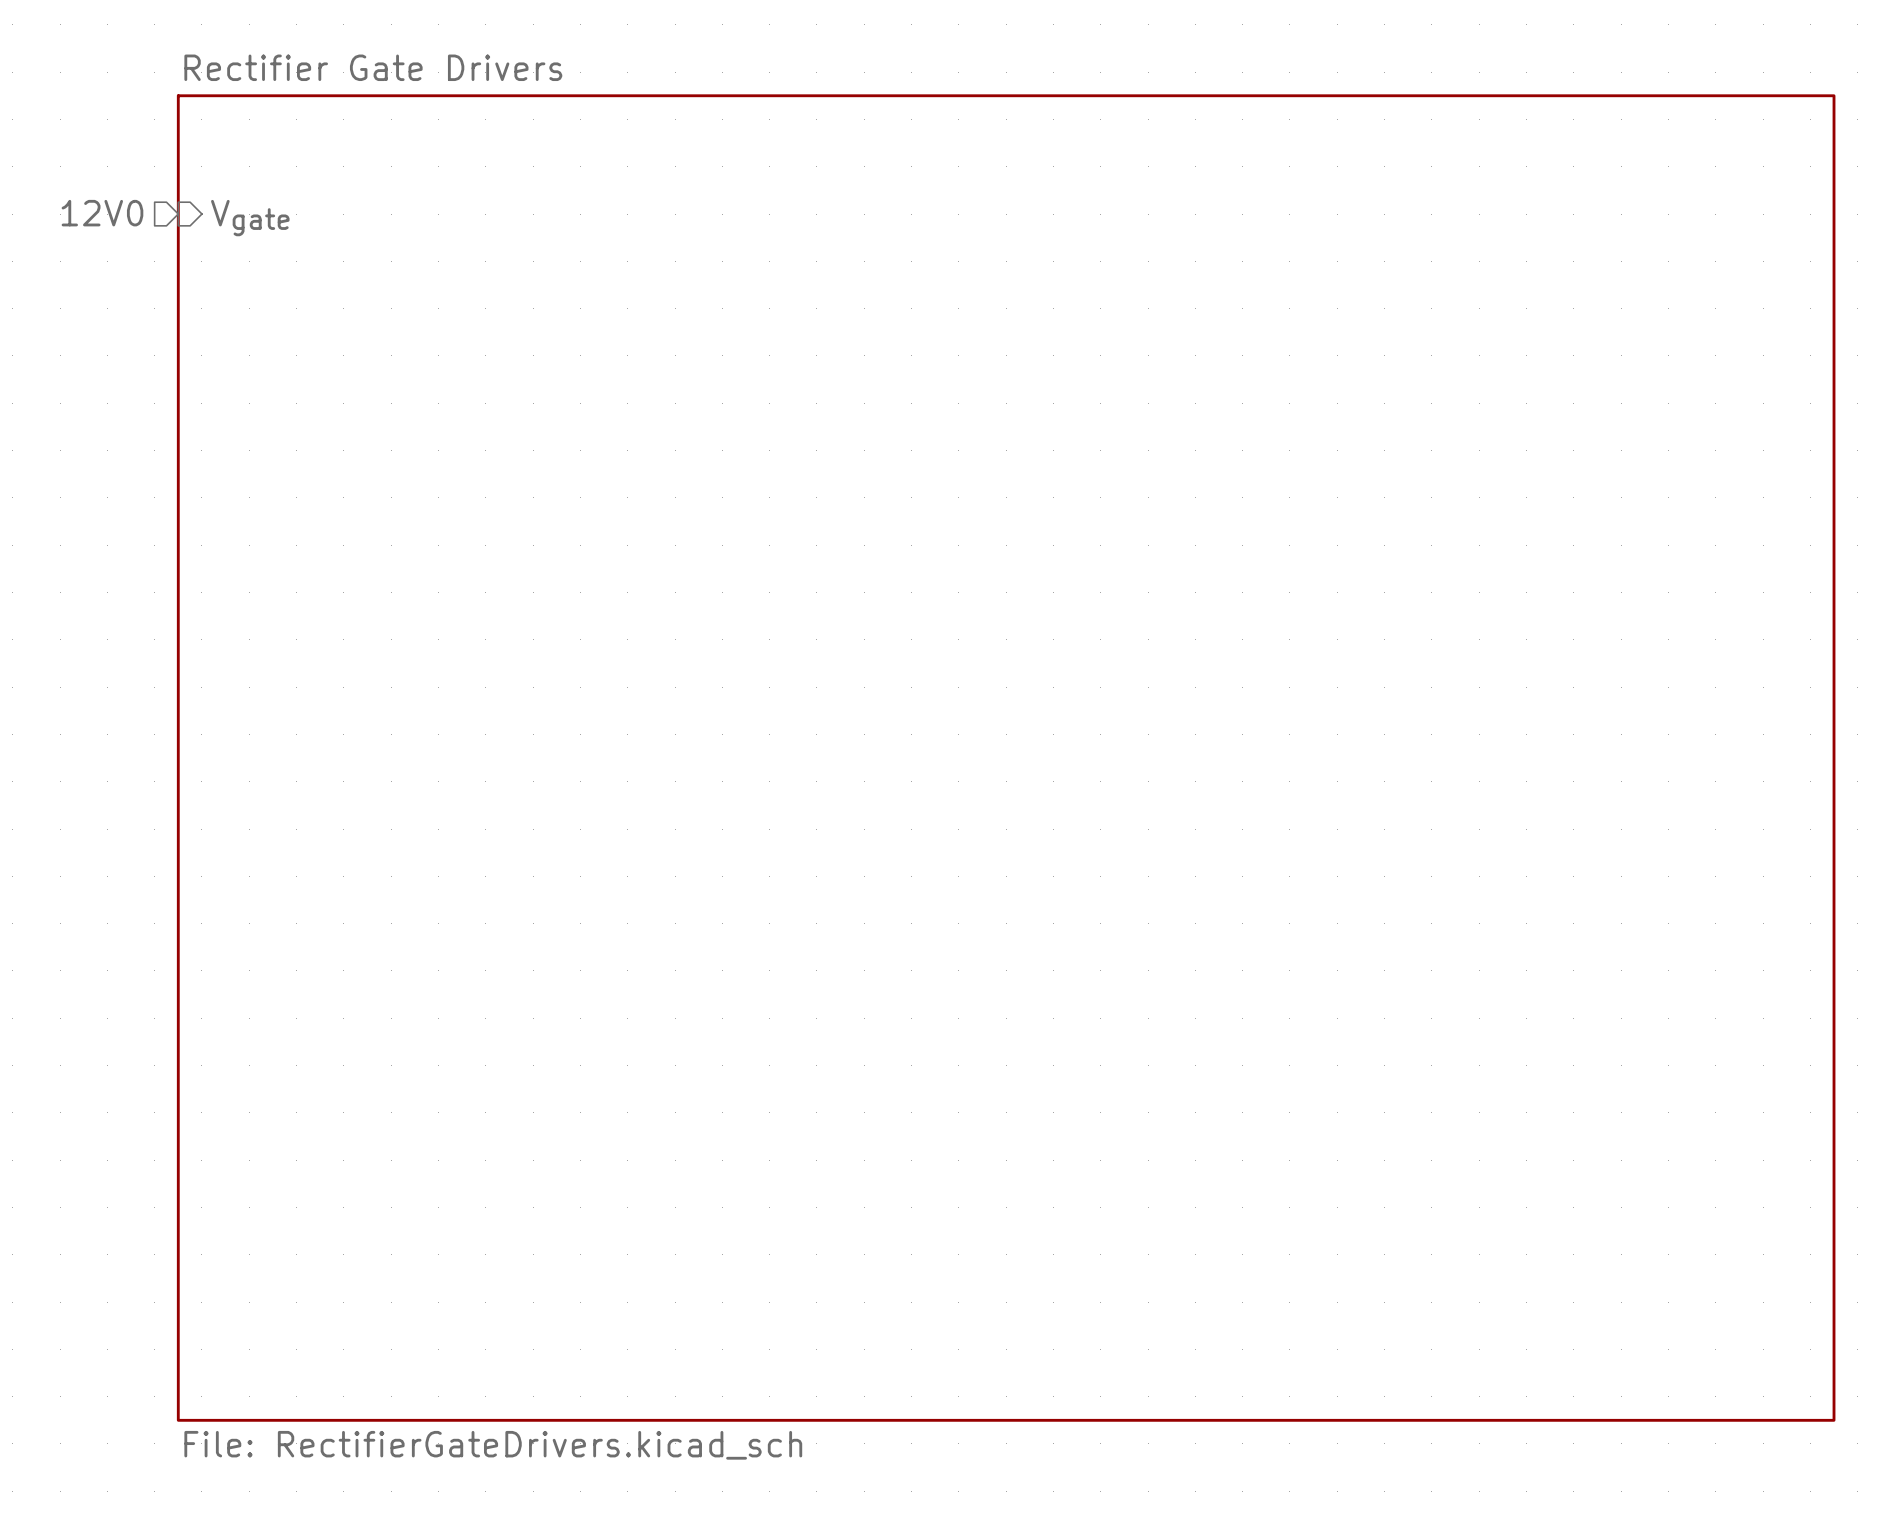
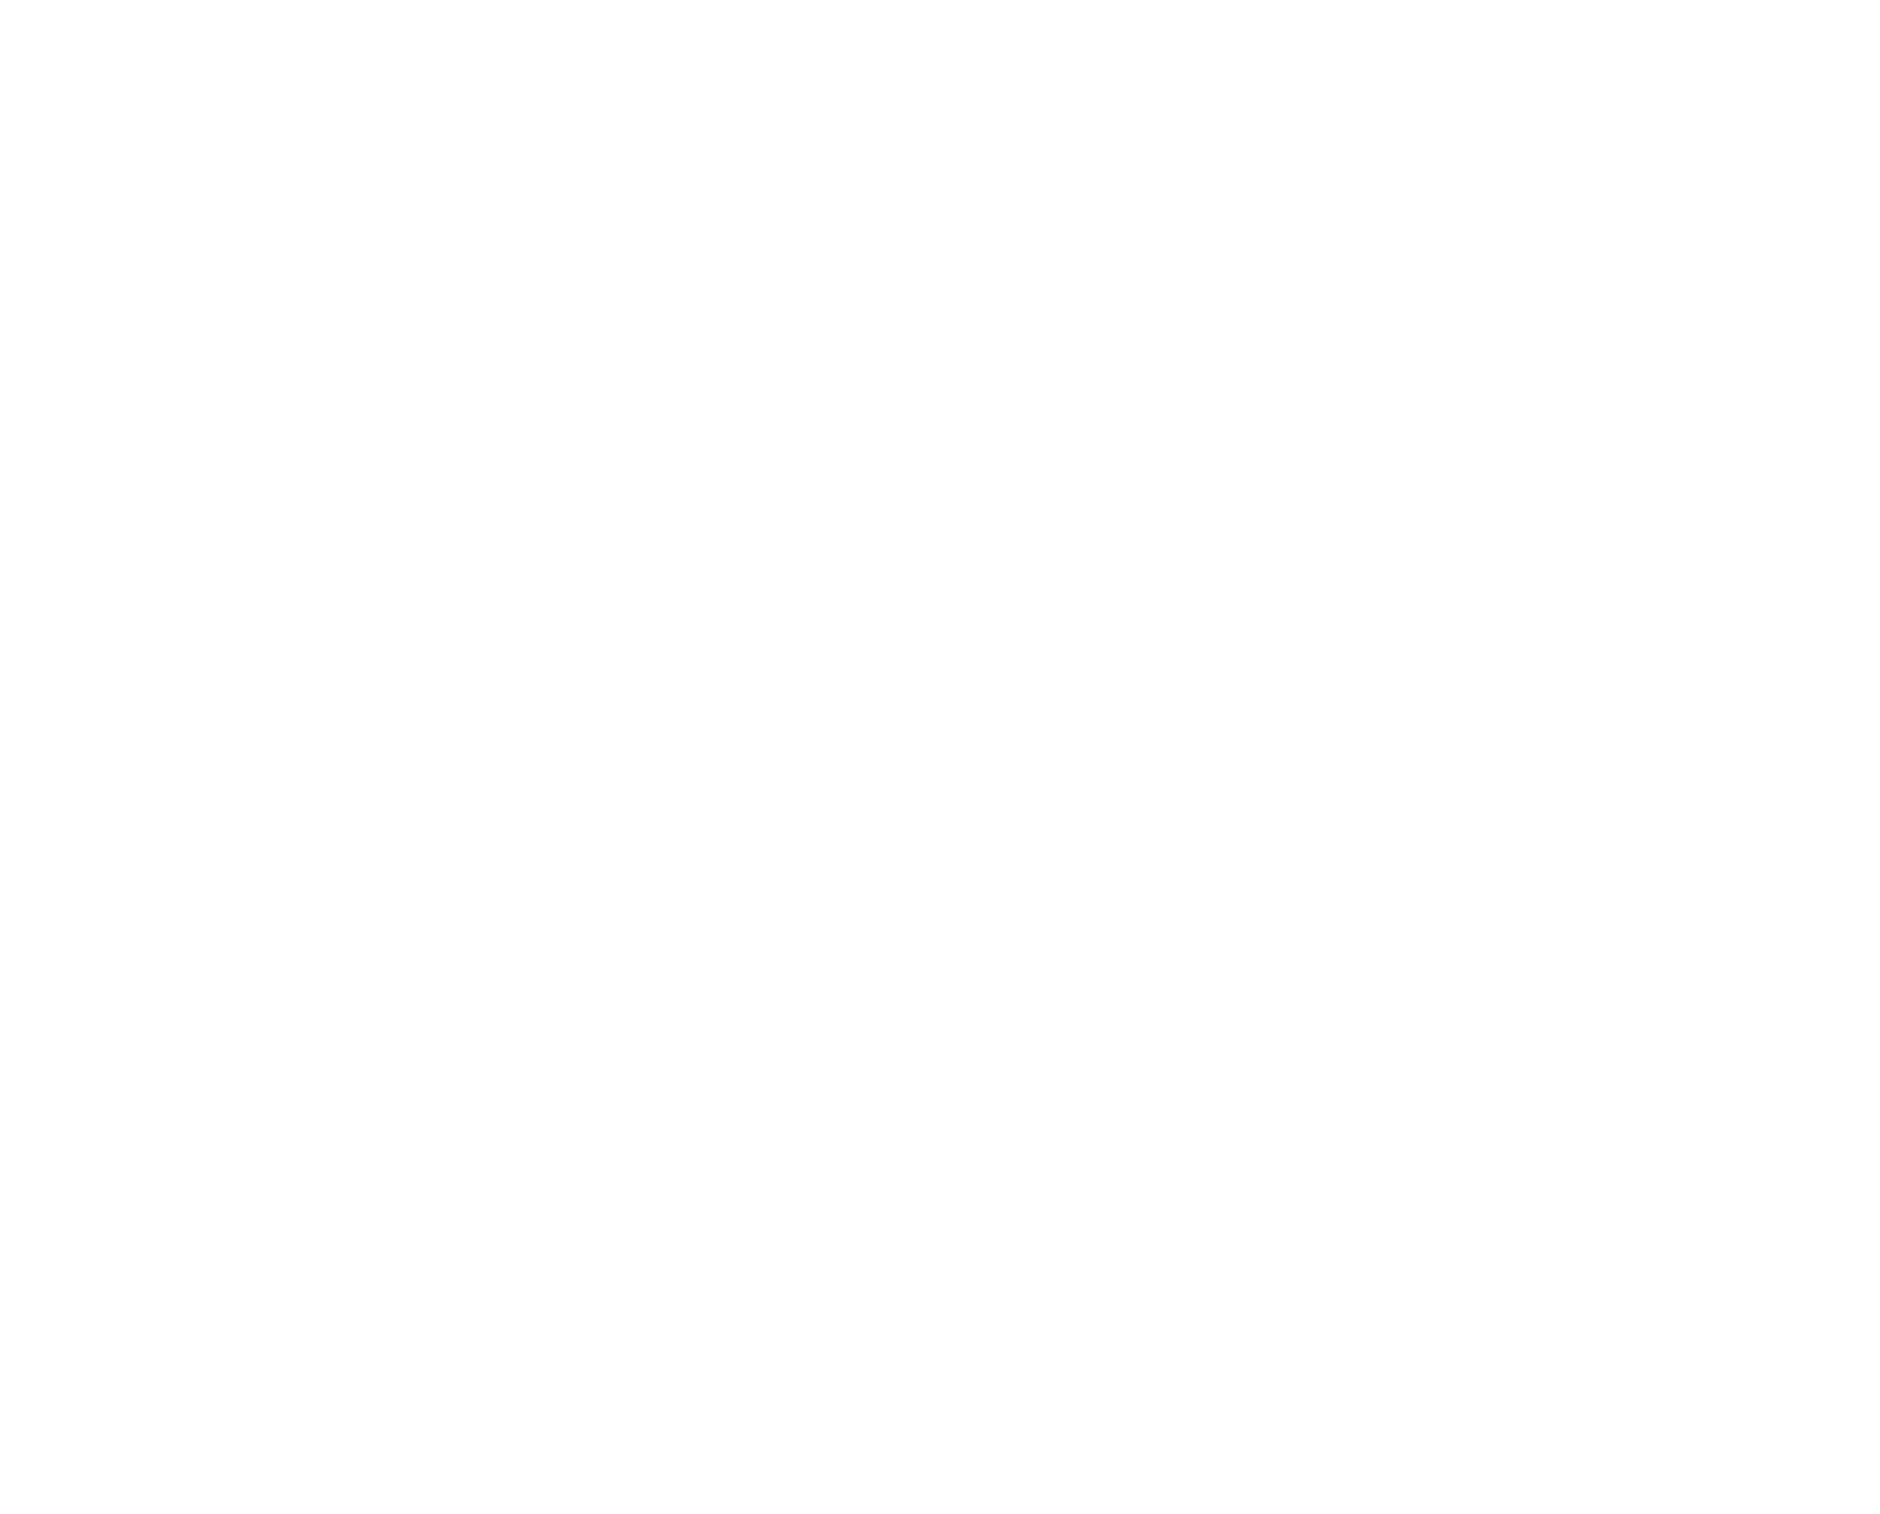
hierarchical label: 12V0 (102, 213) -> none
sheet pin: Vgate (250, 218) -> none
sheet Rectifier Gate Drivers: File: RectifierGateDrivers.kicad_sch (1006, 758) -> none

